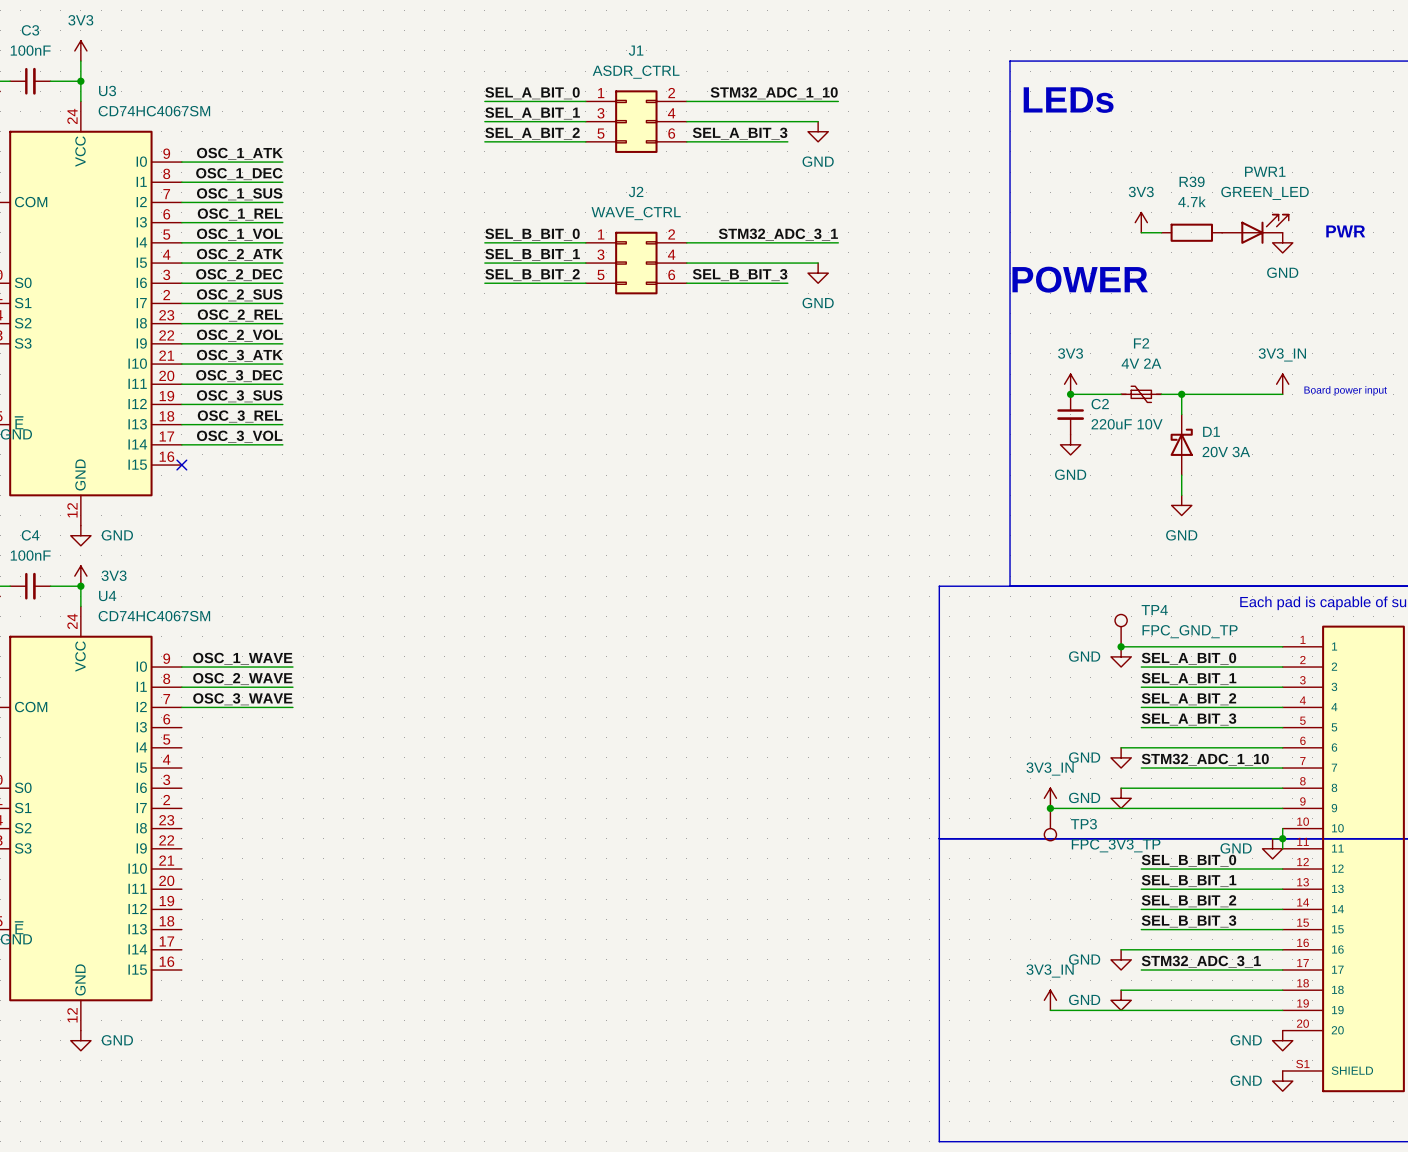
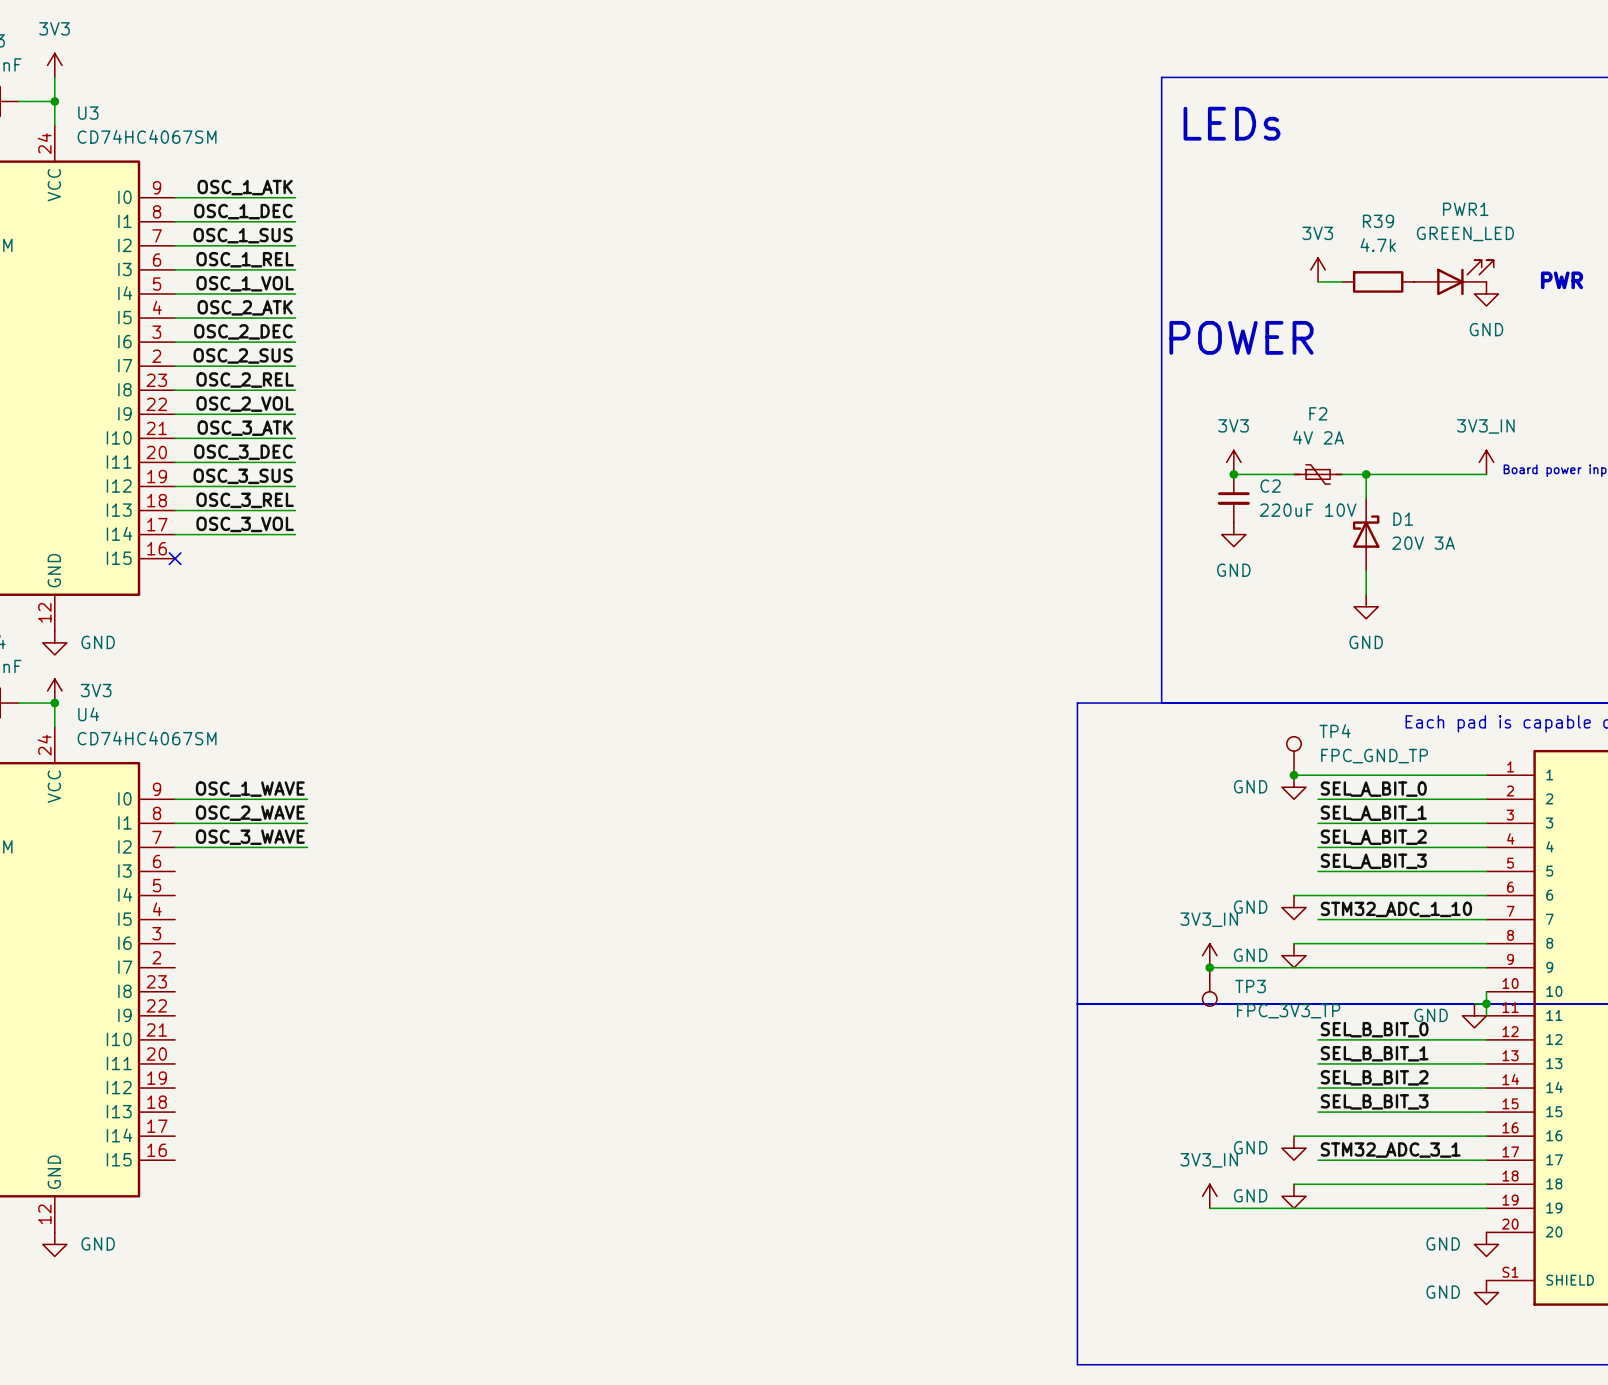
label: SEL_A_BIT_0 (532, 93) -> none
label: STM32_ADC_1_10 (774, 93) -> none
wire: (484, 101) (585, 101) -> none
wire: (686, 101) (838, 101) -> none
label: SEL_A_BIT_1 (532, 113) -> none
wire: (484, 121) (585, 121) -> none
J1: ASDR_CTRL (636, 121) -> none
wire: (686, 121) (818, 121) -> none
power symbol: GND (818, 131) -> none
label: SEL_A_BIT_2 (532, 133) -> none
label: SEL_A_BIT_3 (740, 133) -> none
wire: (484, 141) (585, 141) -> none
wire: (686, 141) (787, 141) -> none
label: SEL_B_BIT_0 (532, 234) -> none
label: STM32_ADC_3_1 (778, 234) -> none
wire: (484, 242) (585, 242) -> none
wire: (686, 242) (838, 242) -> none
label: SEL_B_BIT_1 (532, 254) -> none
wire: (484, 263) (585, 263) -> none
J2: WAVE_CTRL (636, 263) -> none
wire: (686, 263) (818, 263) -> none
power symbol: GND (818, 273) -> none
label: SEL_B_BIT_2 (532, 275) -> none
label: SEL_B_BIT_3 (740, 275) -> none
wire: (484, 283) (585, 283) -> none
wire: (686, 283) (787, 283) -> none

